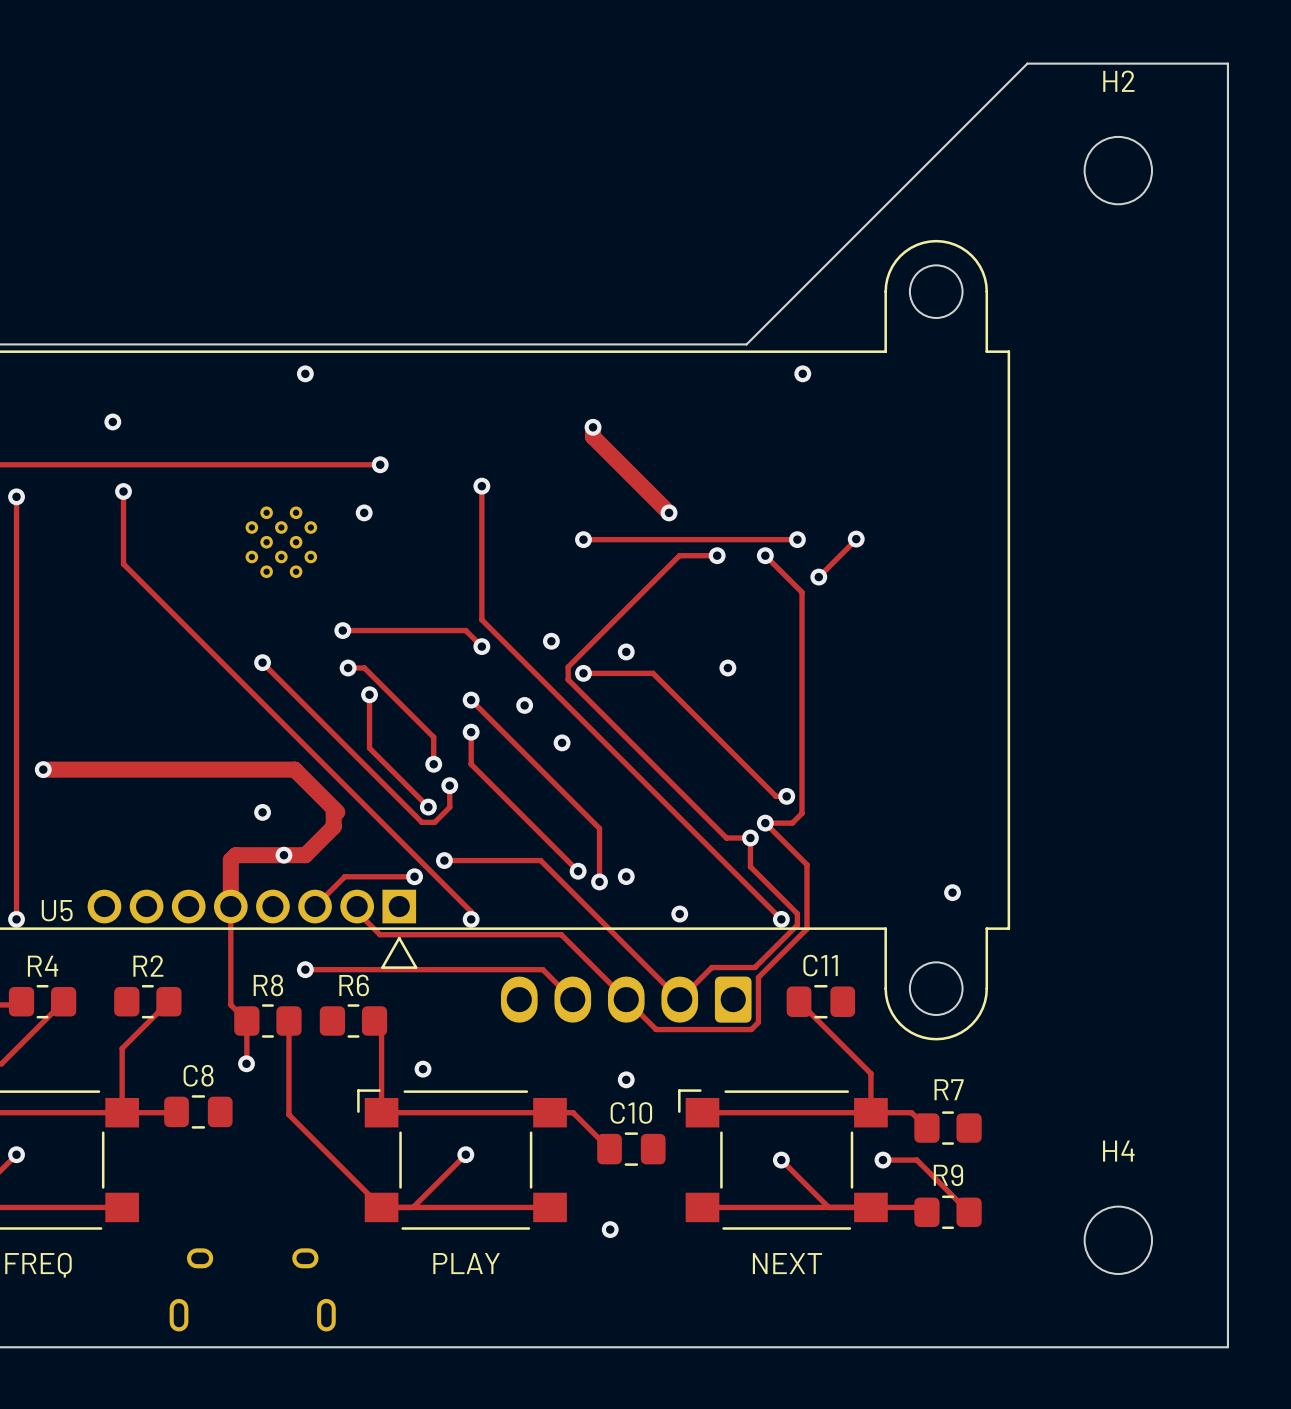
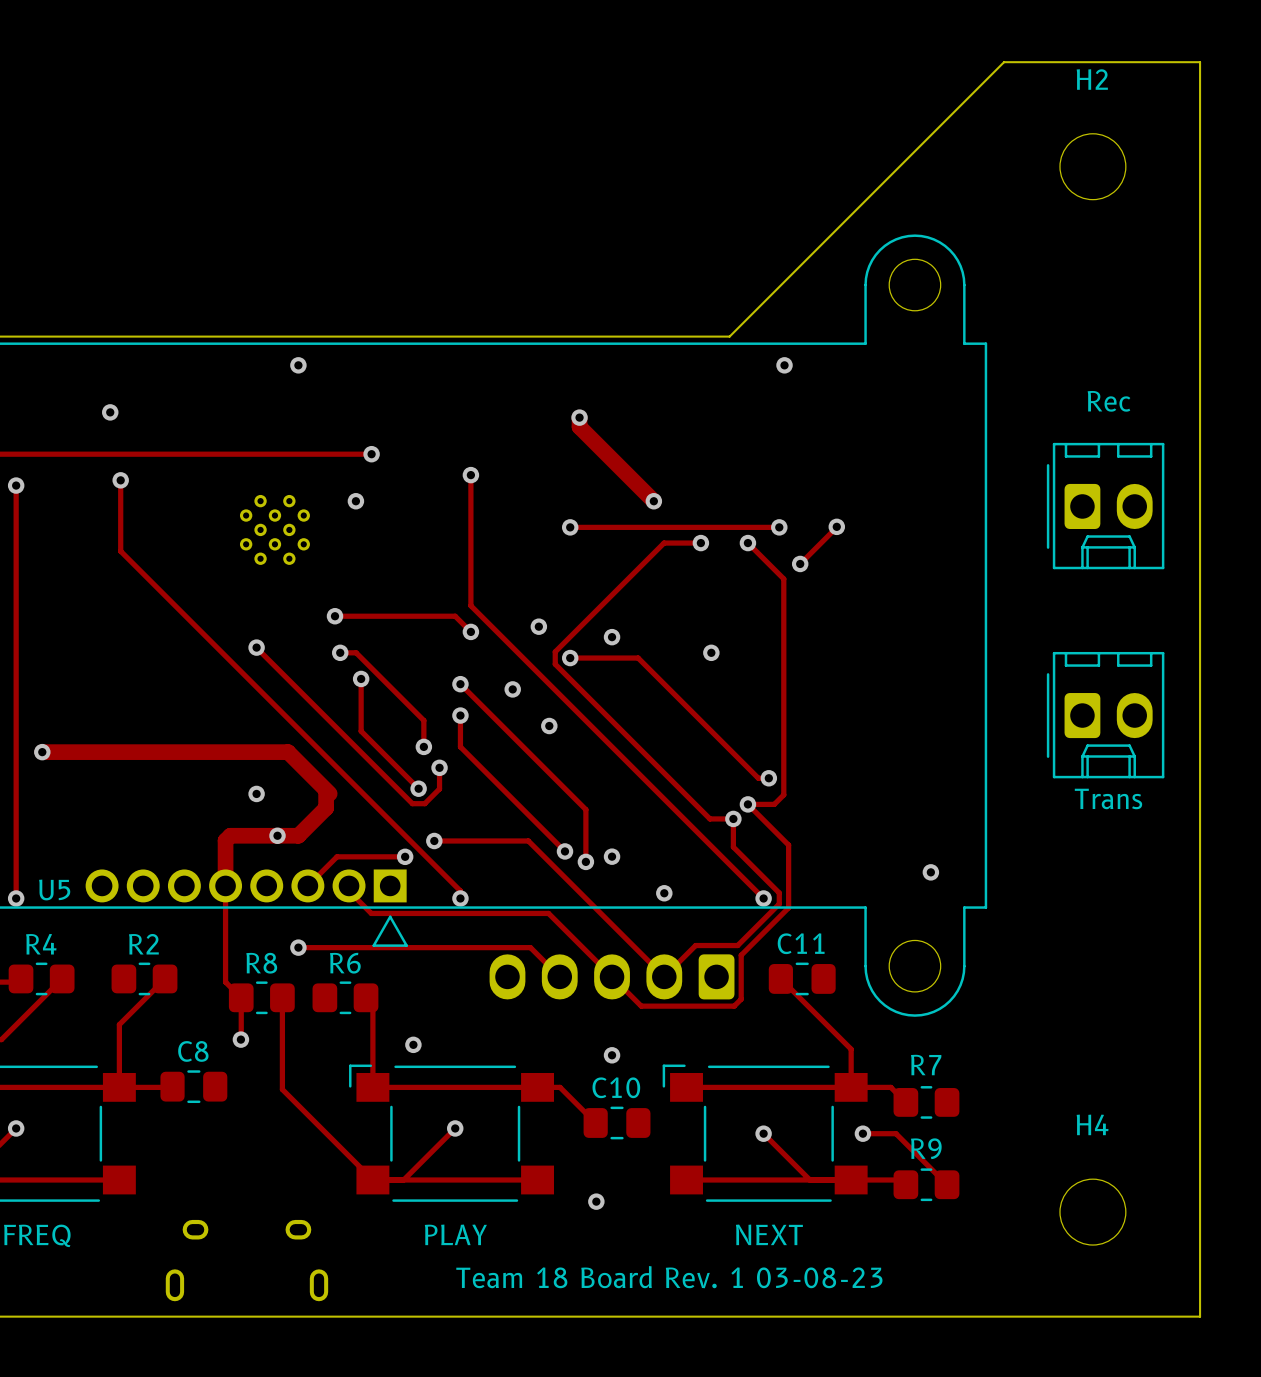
part: none -> Rec (1105, 506)
part: none -> Trans (1105, 715)
text: none -> Team 18 Board Rev. 1 03-08-23 (669, 1277)

